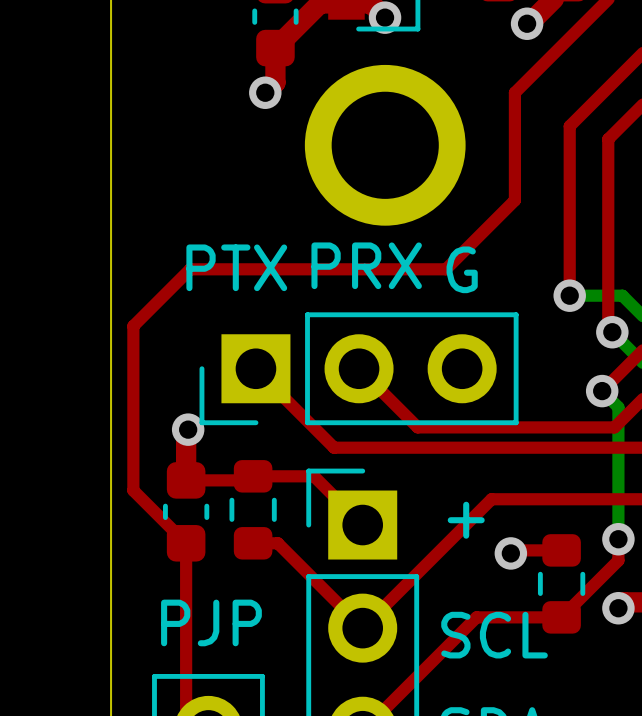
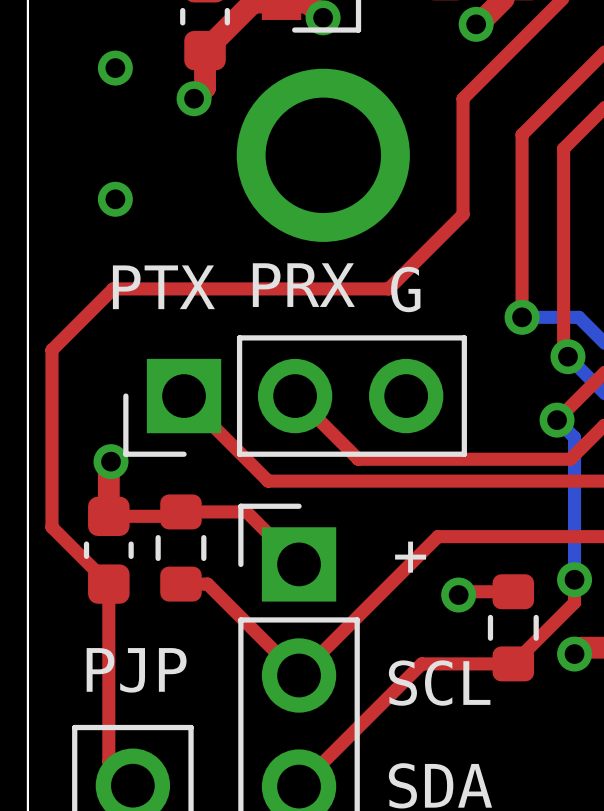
via: none -> (115, 68)
via: none -> (115, 199)

